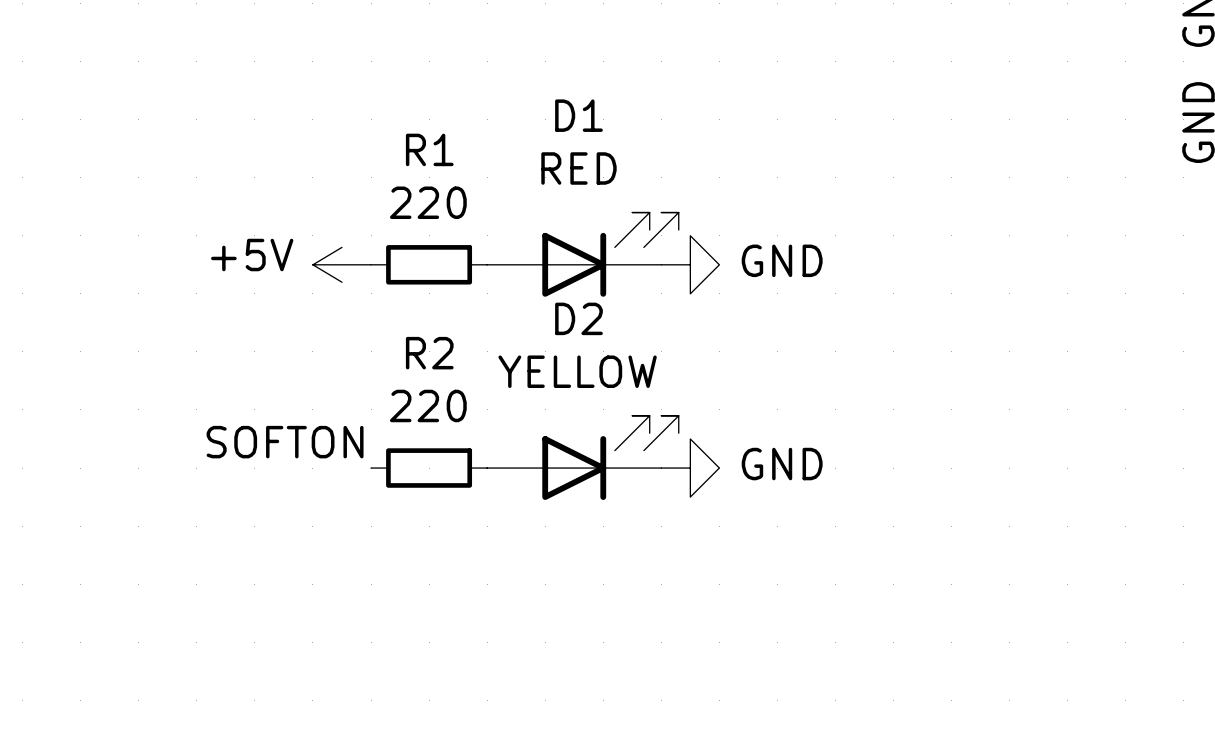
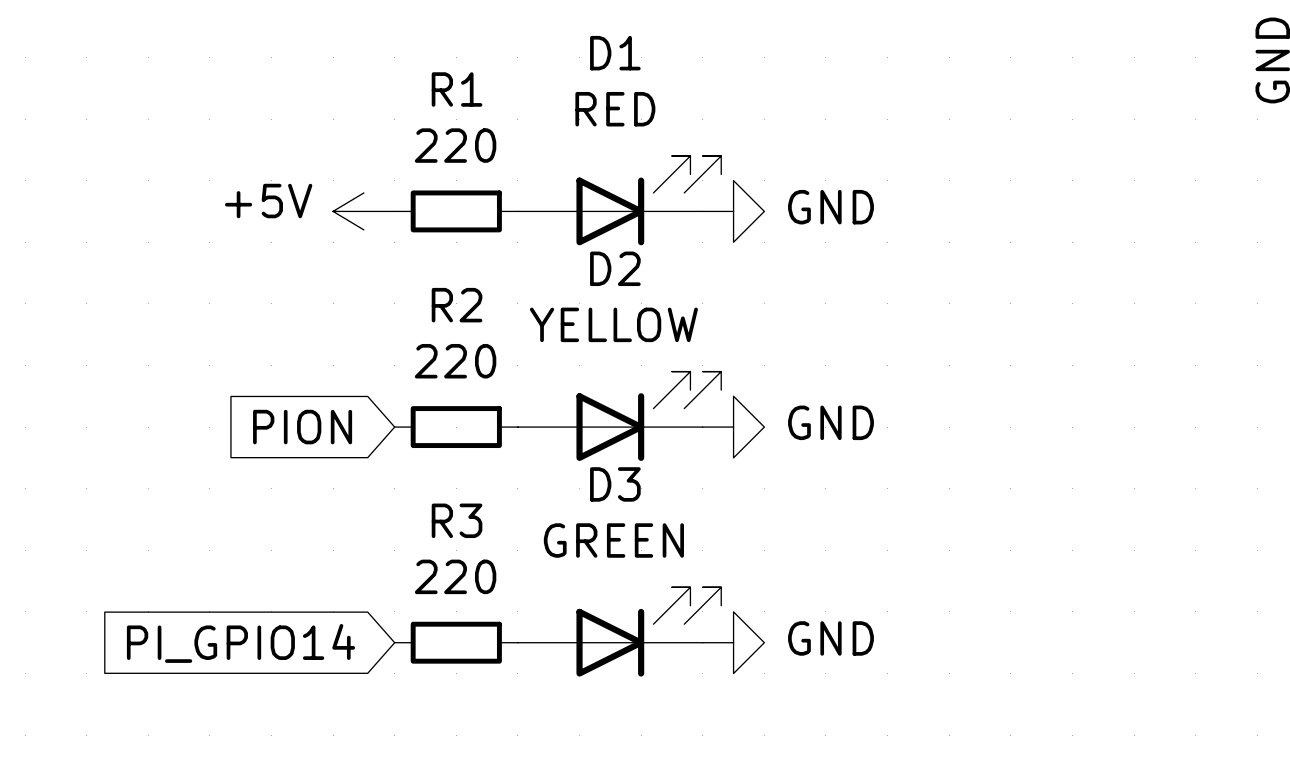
label: SOFTON (285, 442) -> none
global label: none -> PION (302, 427)
D3: none -> GREEN (619, 631)
global label: none -> PI_GPIO14 (240, 643)
R3: none -> 220 (456, 642)
power symbol: none -> GND (733, 642)

